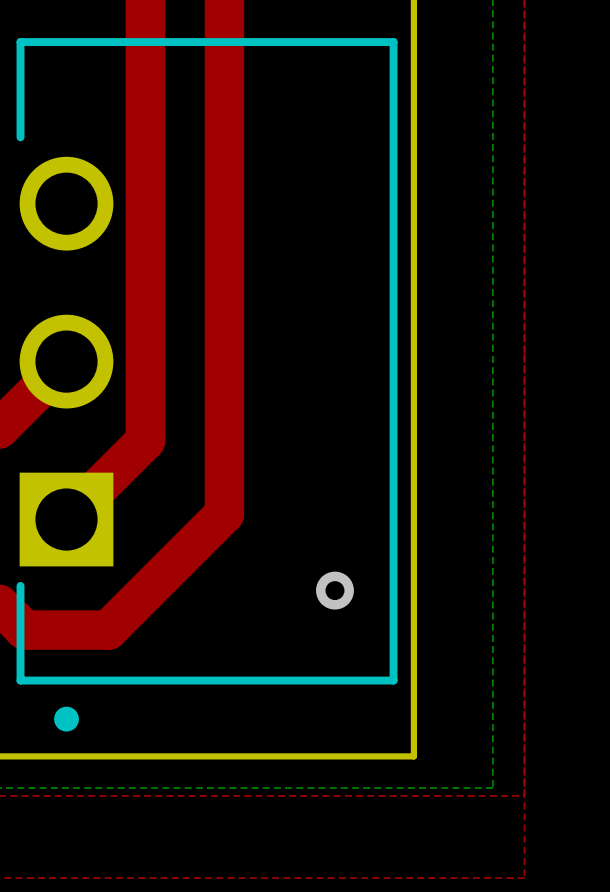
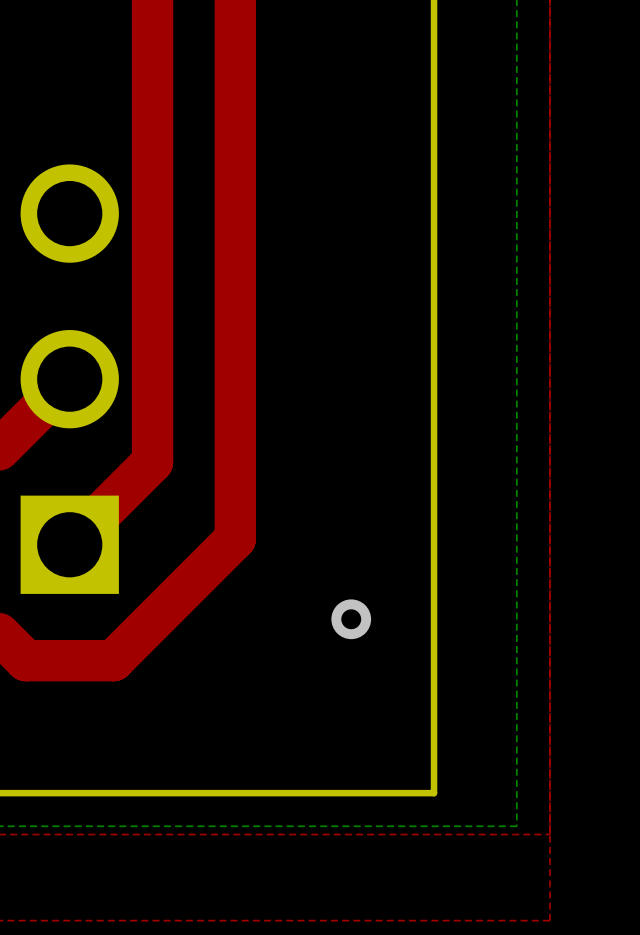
part: (207, 384) -> none

